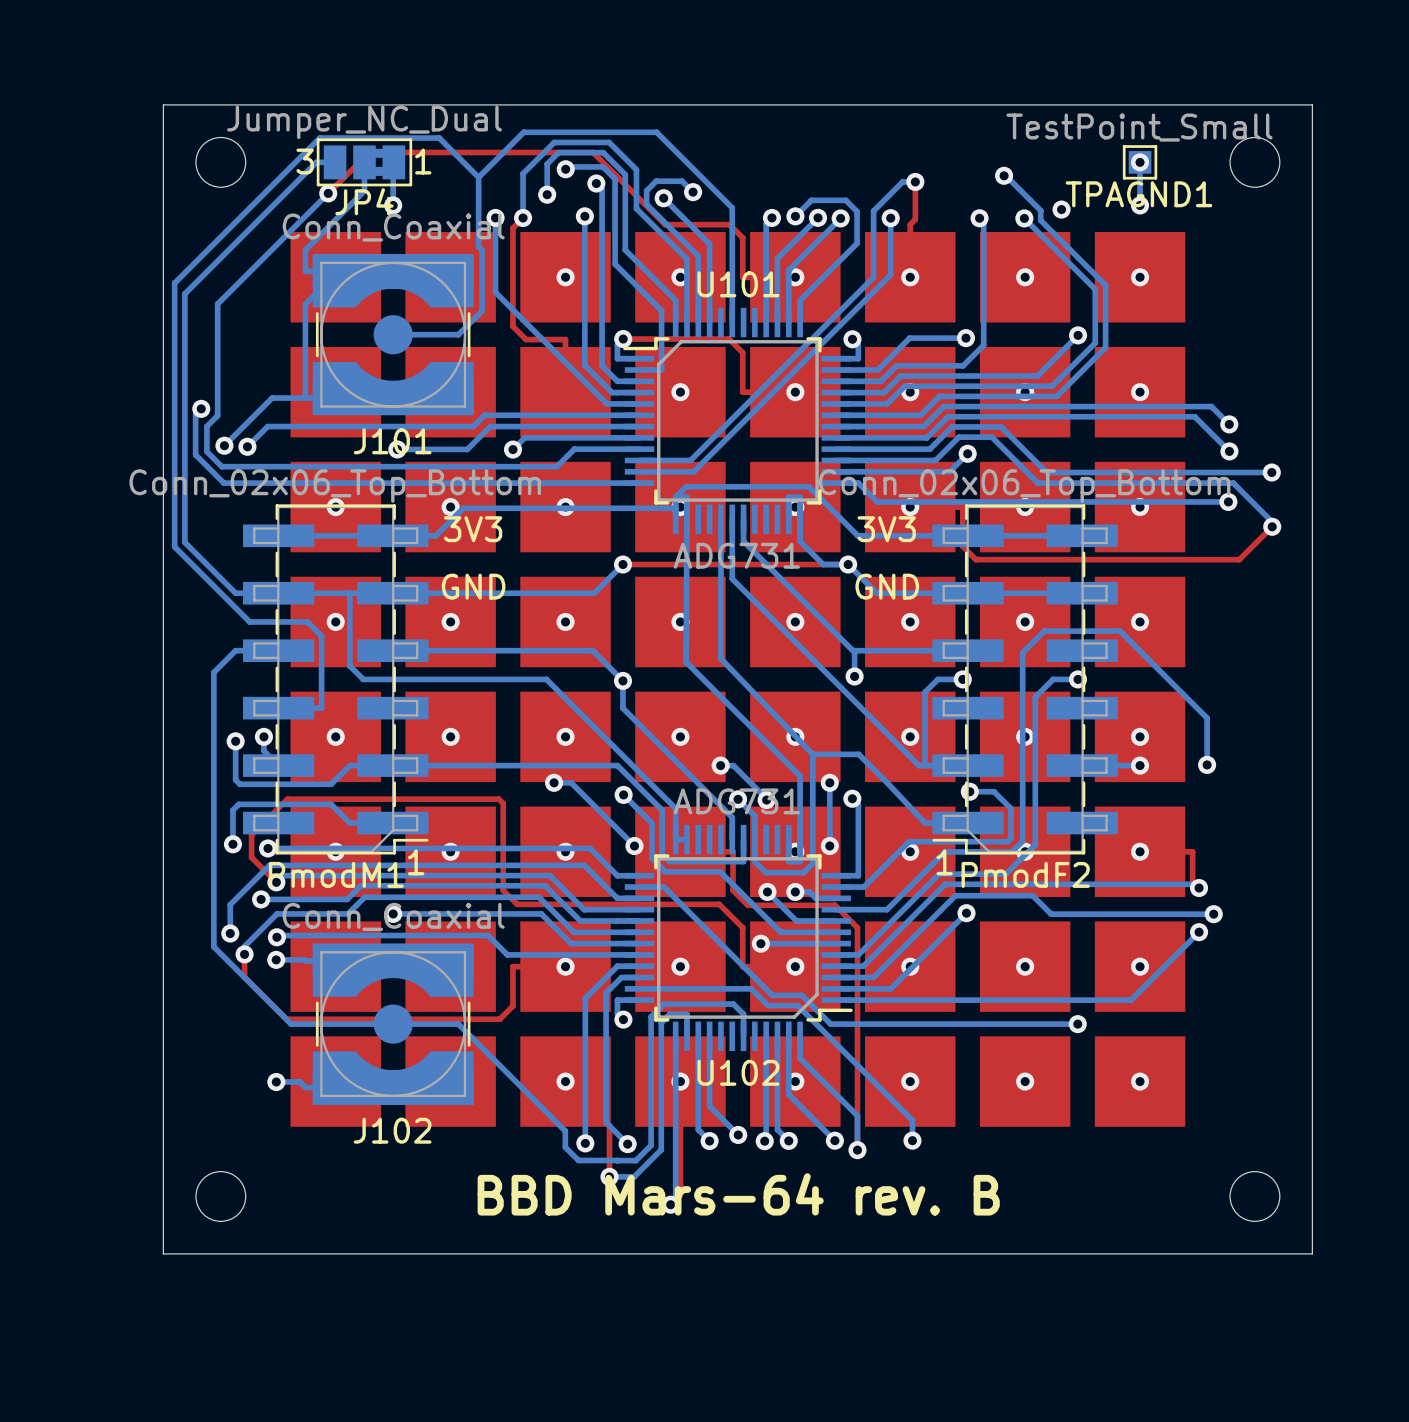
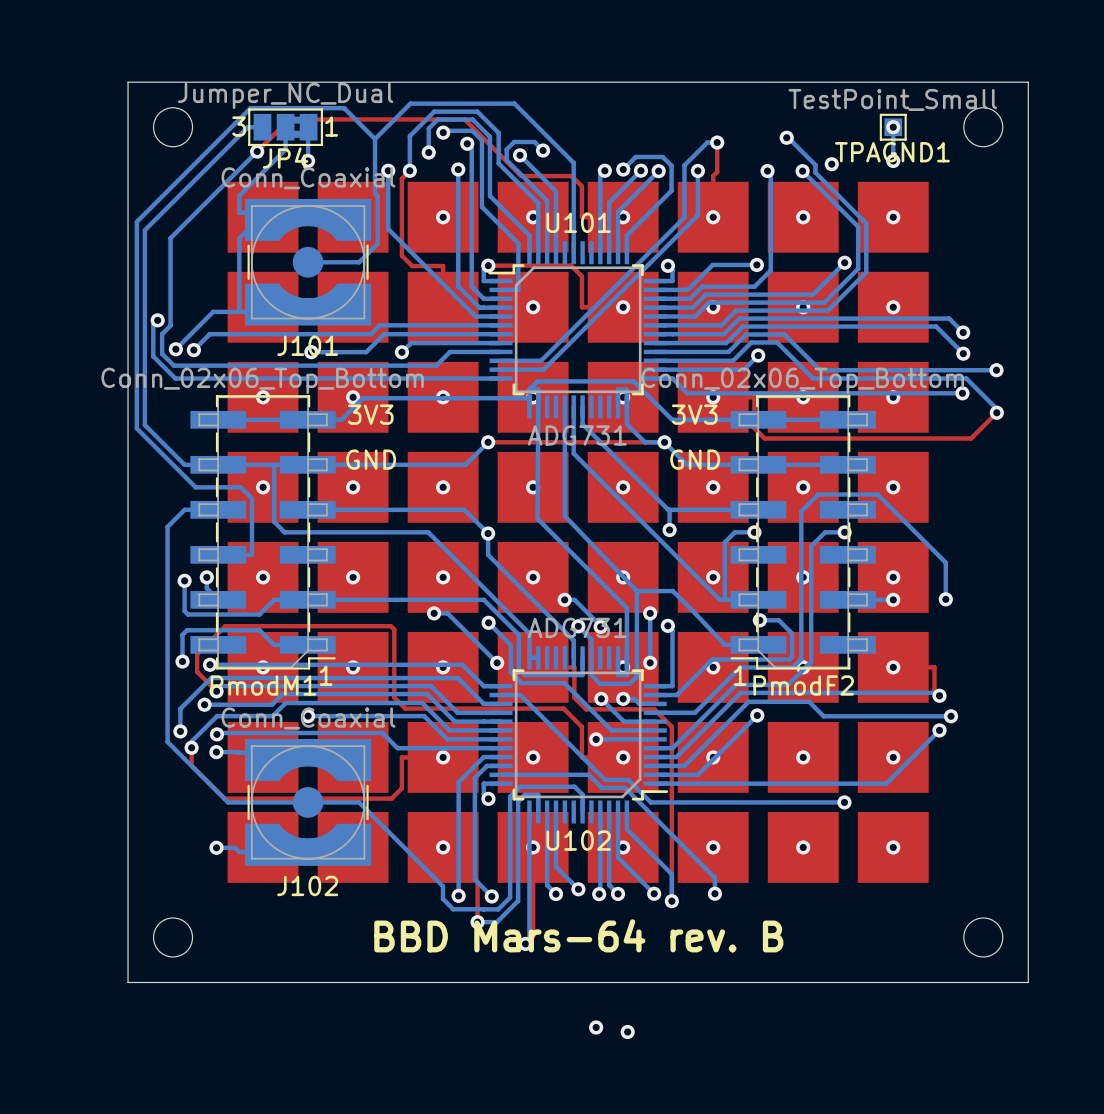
via: none -> (596, 1027)
via: none -> (627, 1032)

